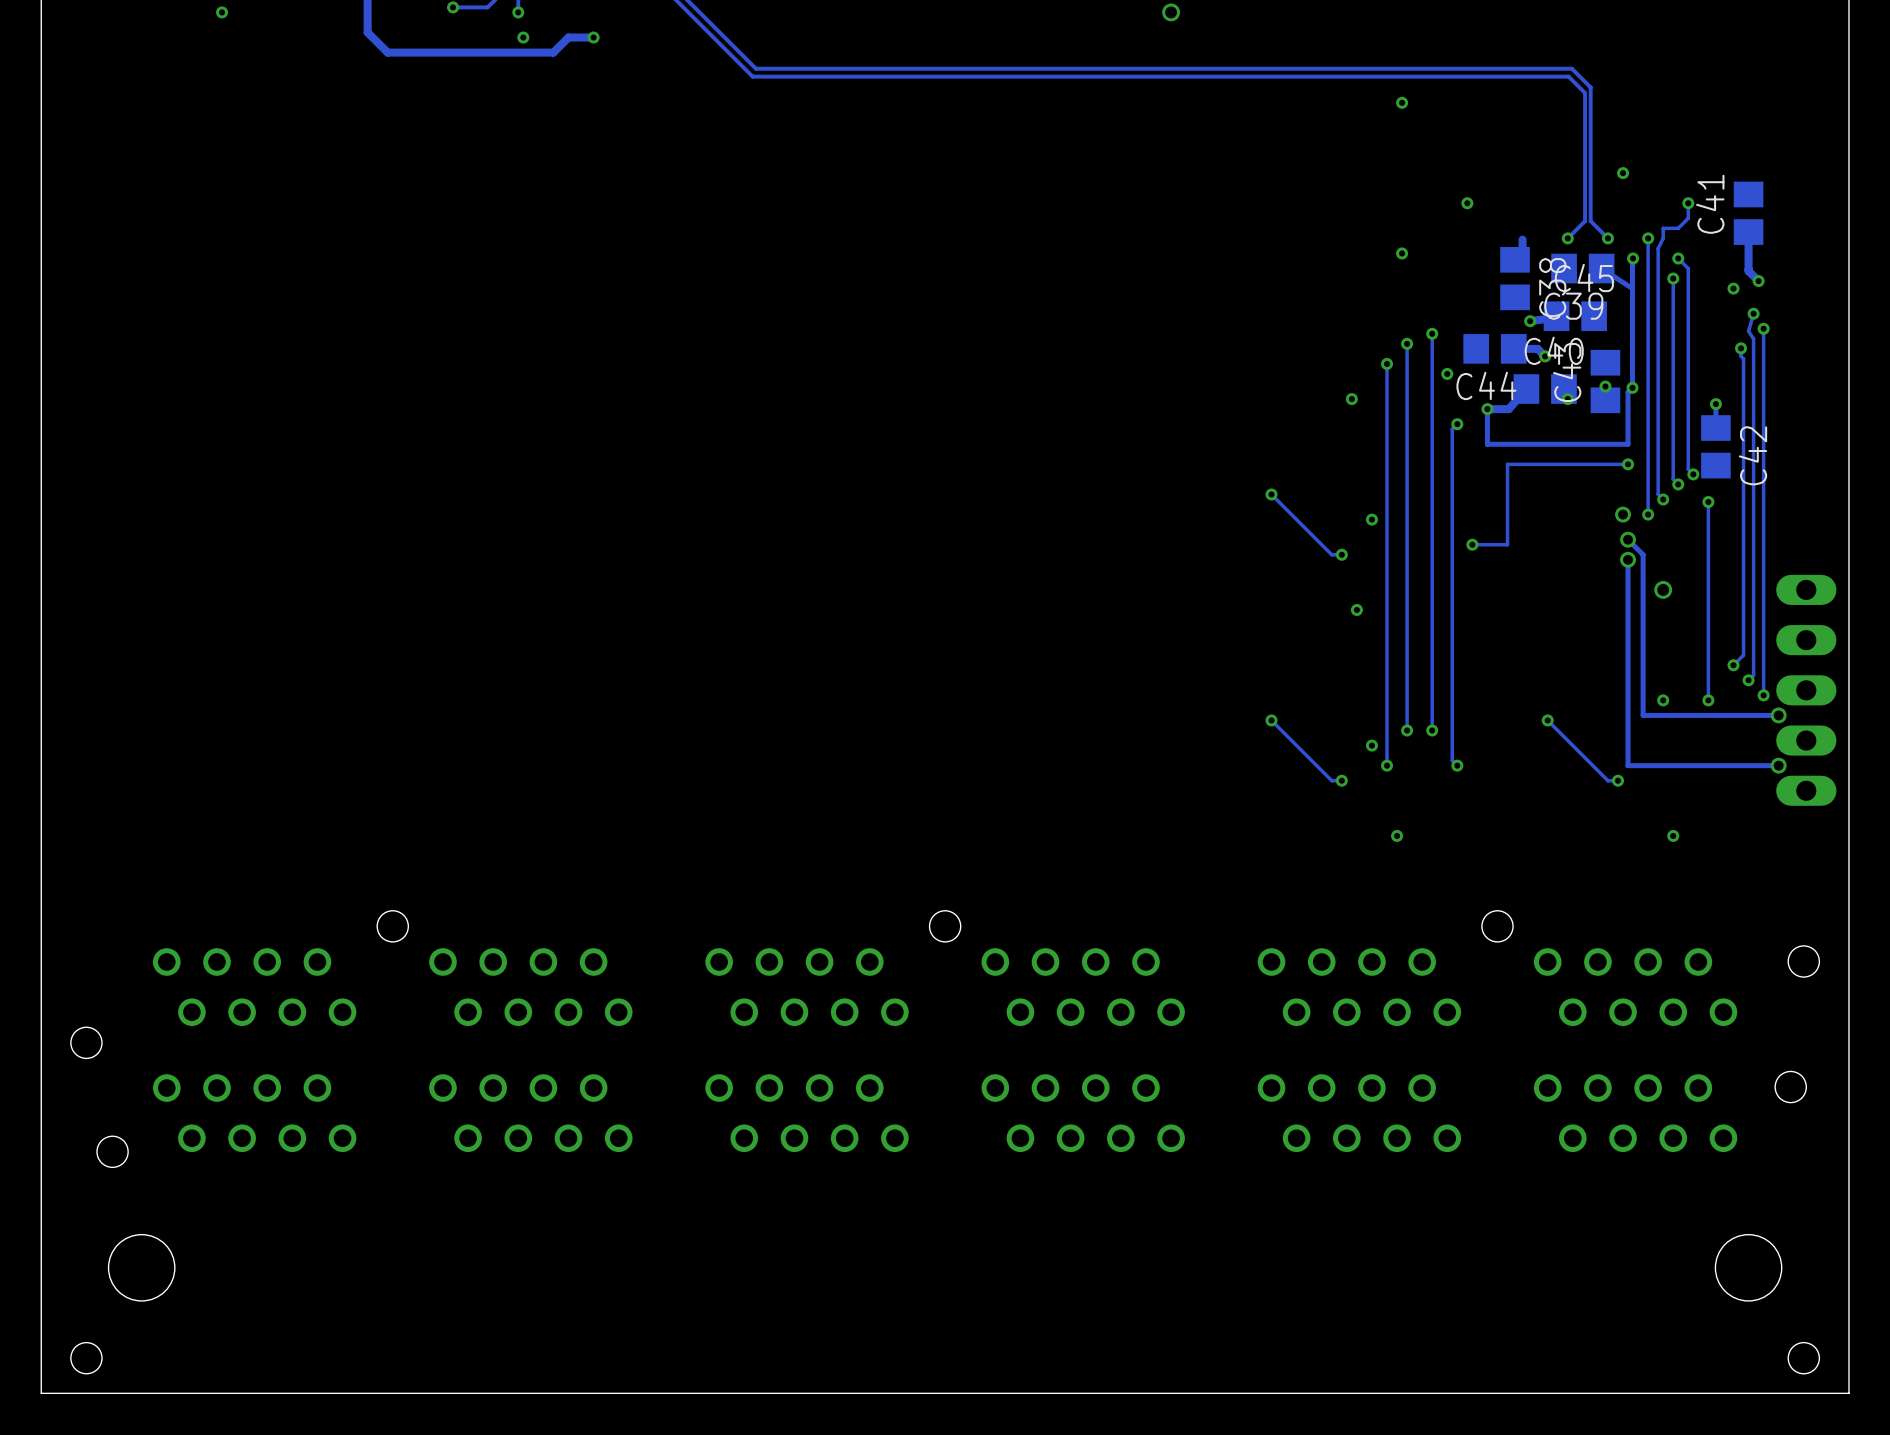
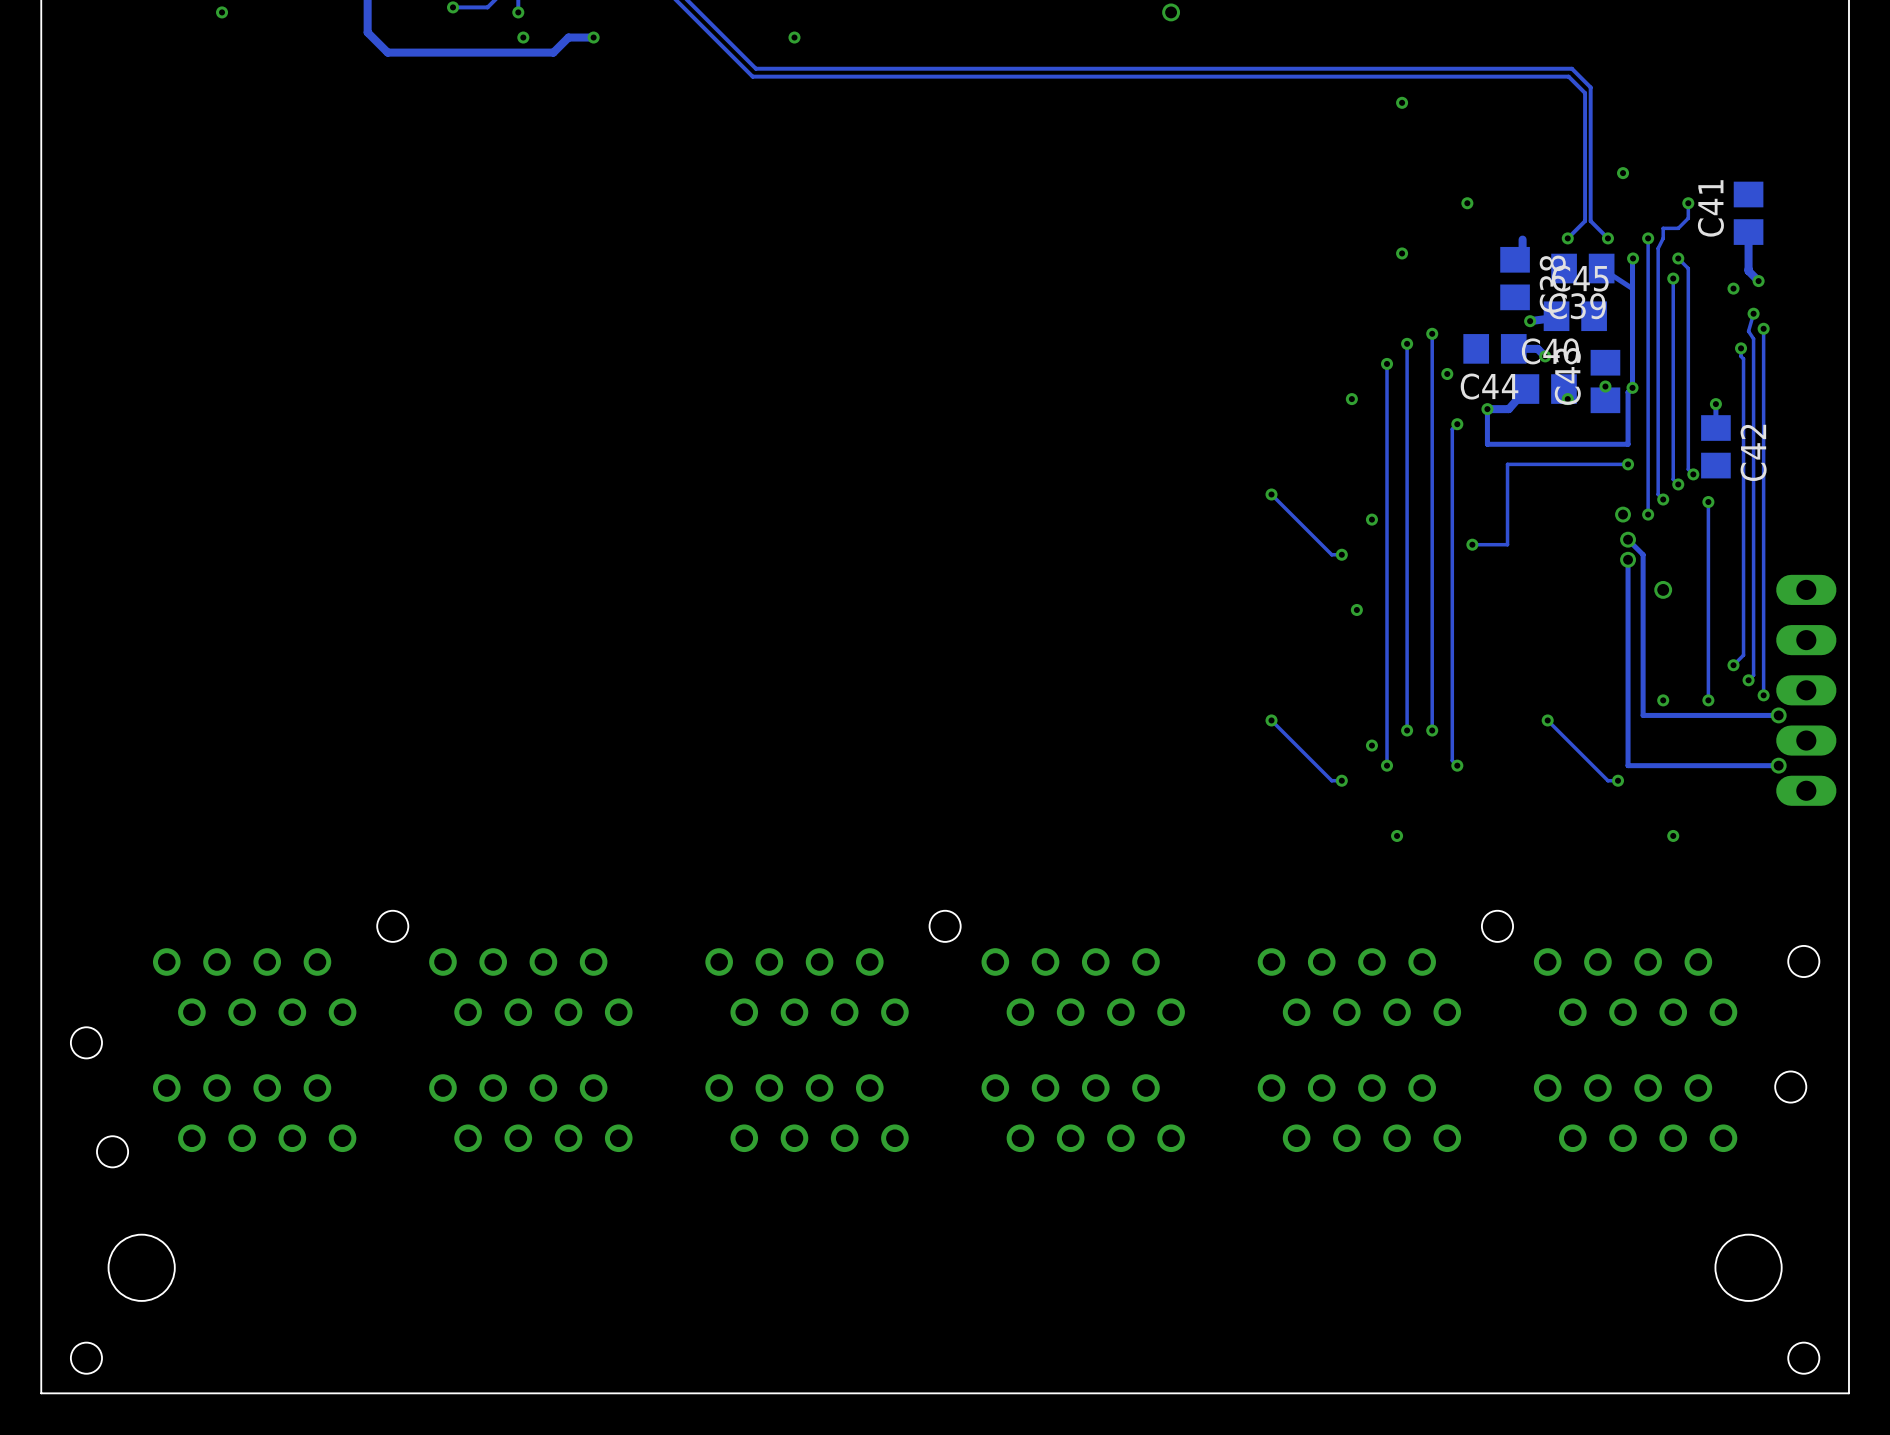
via: none -> (794, 37)

